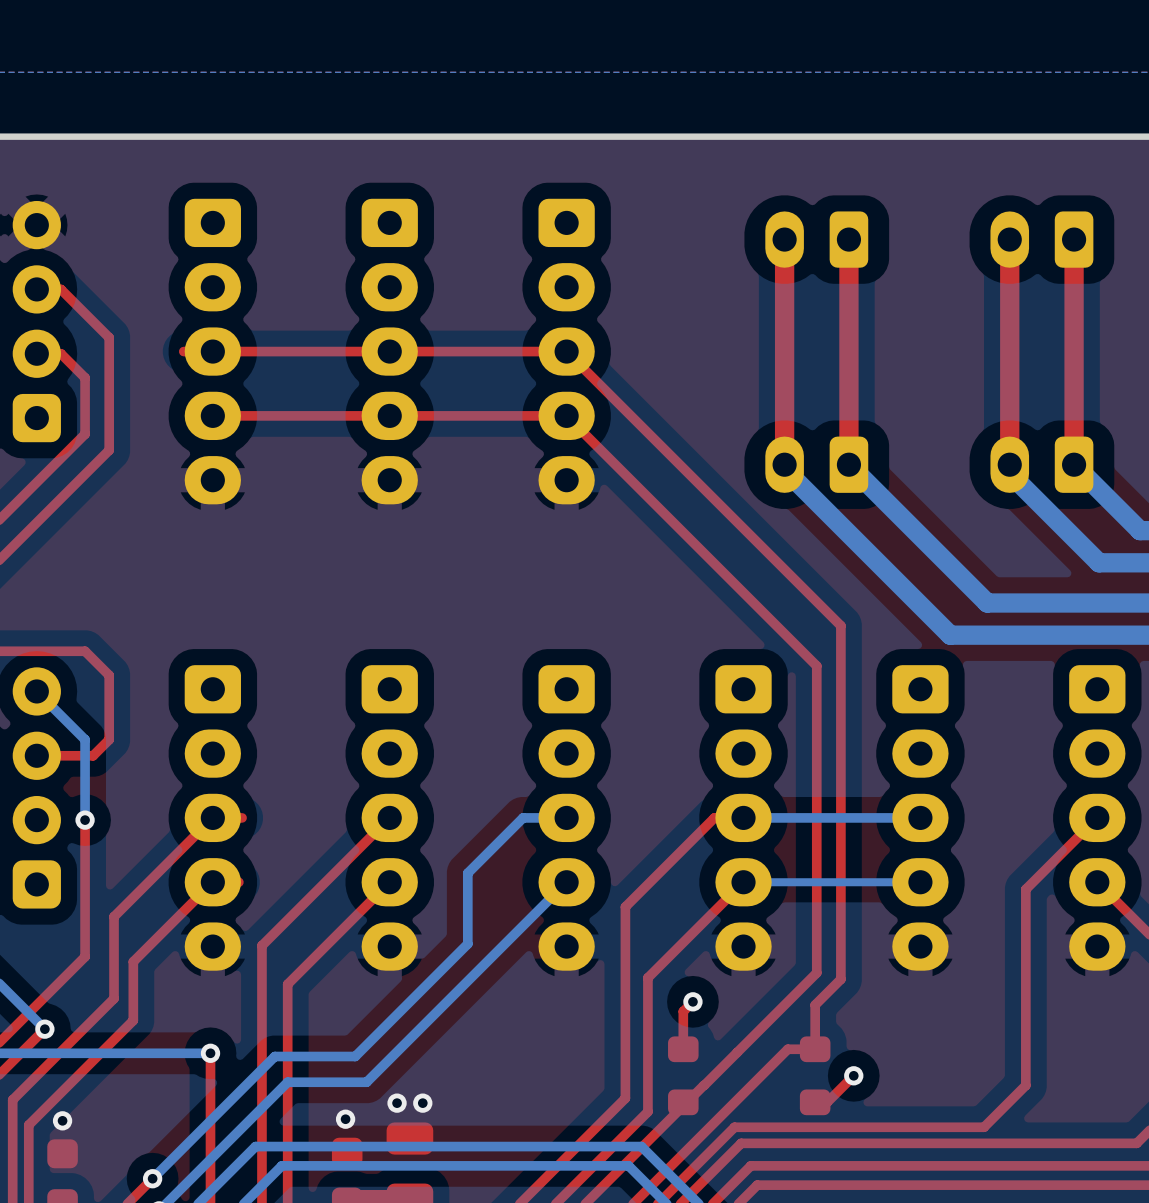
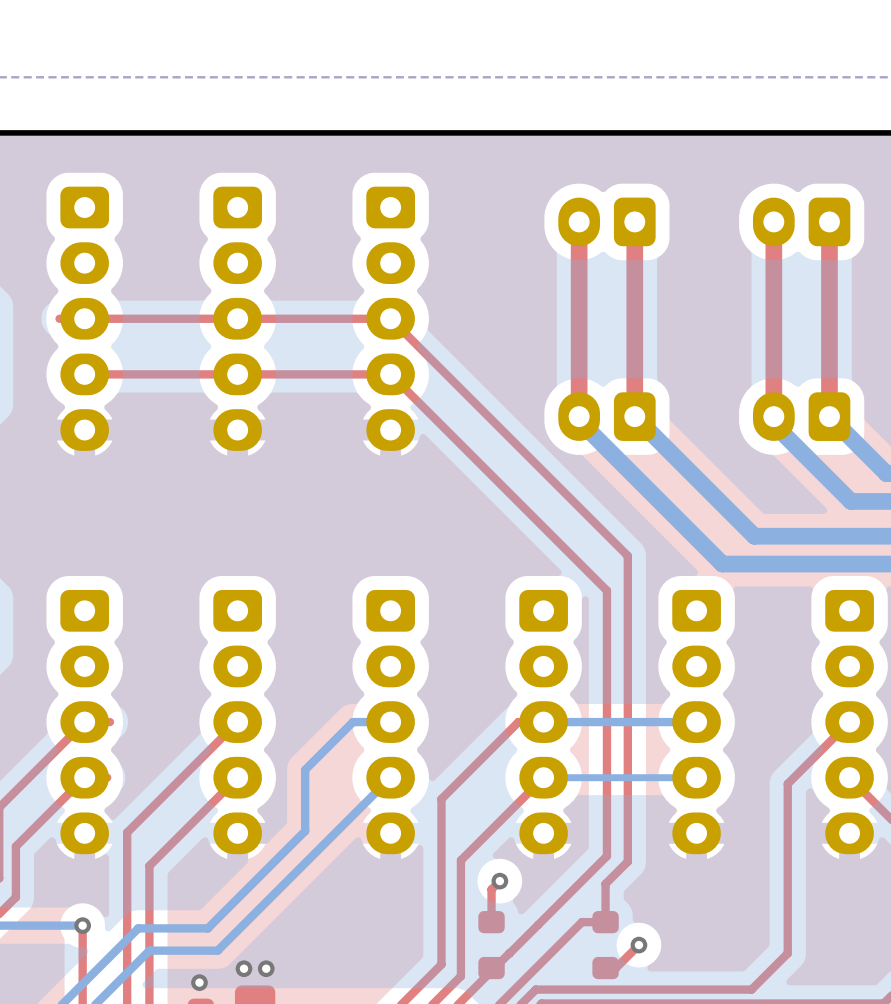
part footprint: [765, 211, 869, 268] -> [558, 197, 656, 247]
part footprint: [990, 211, 1094, 268] -> [752, 197, 851, 247]
part footprint: [765, 436, 869, 493] -> [558, 392, 656, 441]
part footprint: [990, 436, 1094, 493] -> [752, 392, 851, 441]

